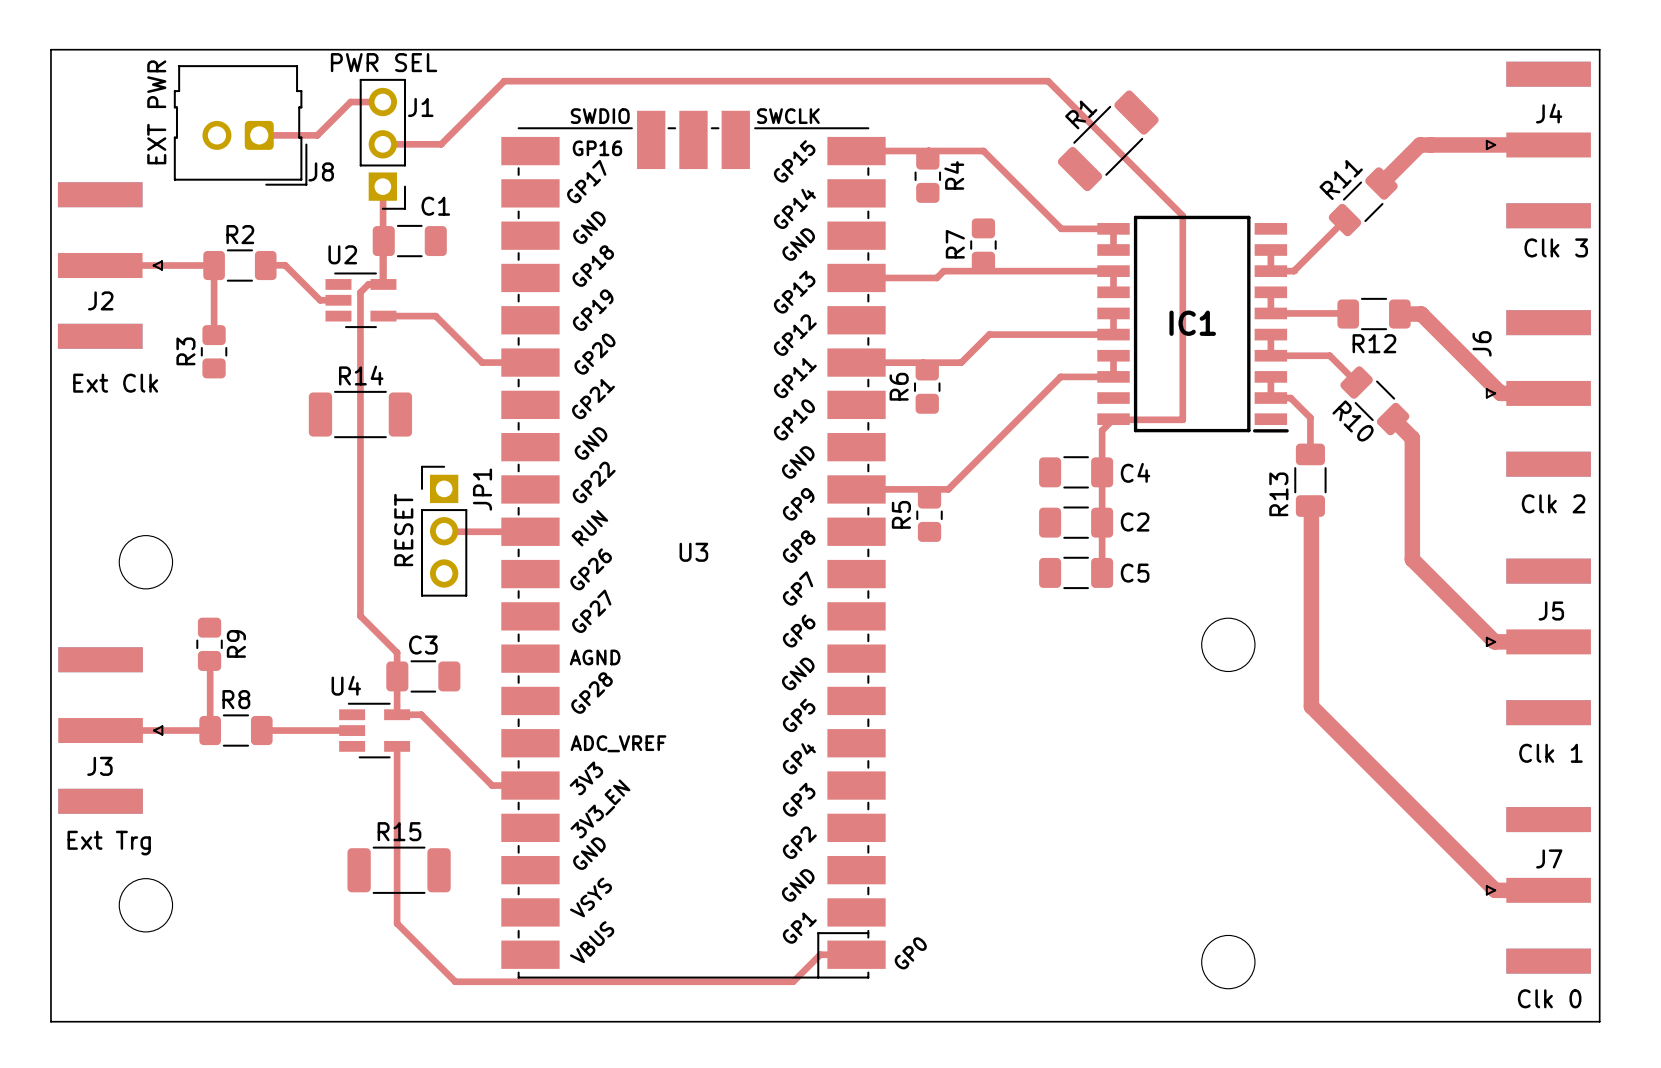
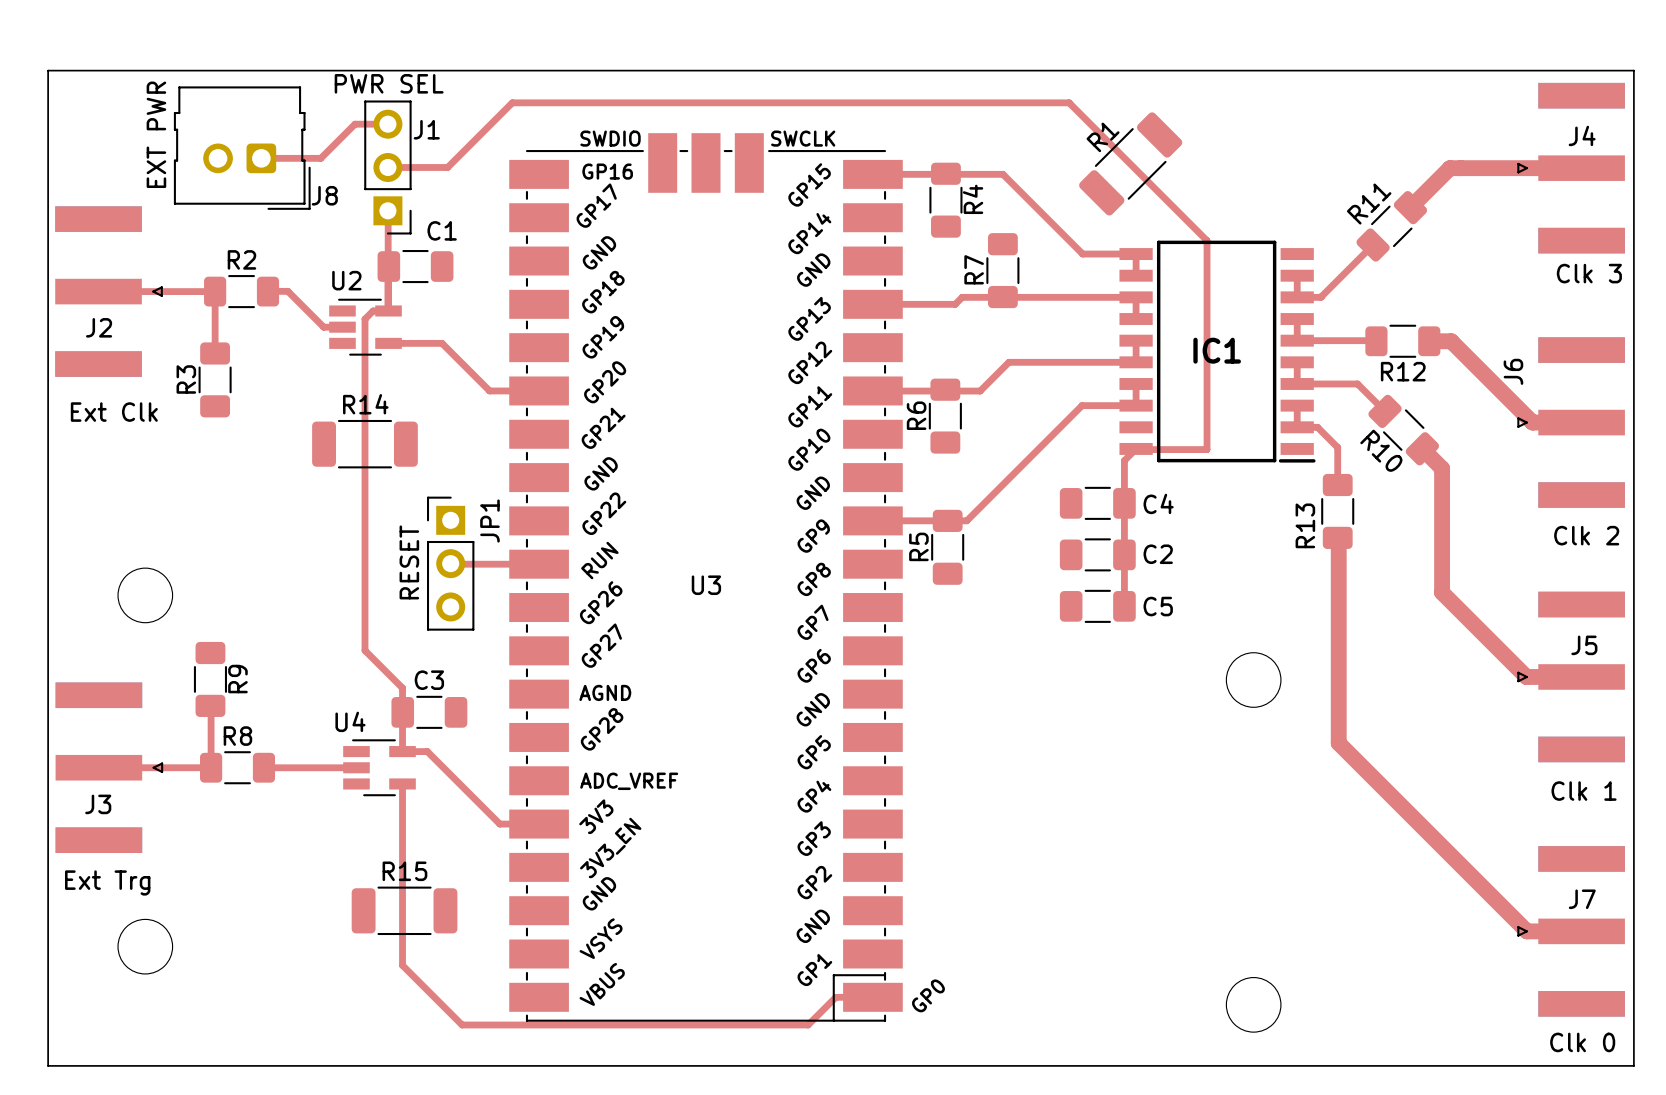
R4 footprint: [914, 149, 942, 203] -> [929, 162, 963, 238]
R7 footprint: [970, 218, 997, 272] -> [986, 233, 1020, 309]
R3 footprint: [200, 325, 228, 379] -> [198, 342, 232, 418]
R6 footprint: [914, 360, 941, 414] -> [928, 378, 962, 454]
R5 footprint: [916, 488, 943, 542] -> [931, 509, 965, 585]
R9 footprint: [196, 617, 223, 671] -> [193, 641, 228, 717]

